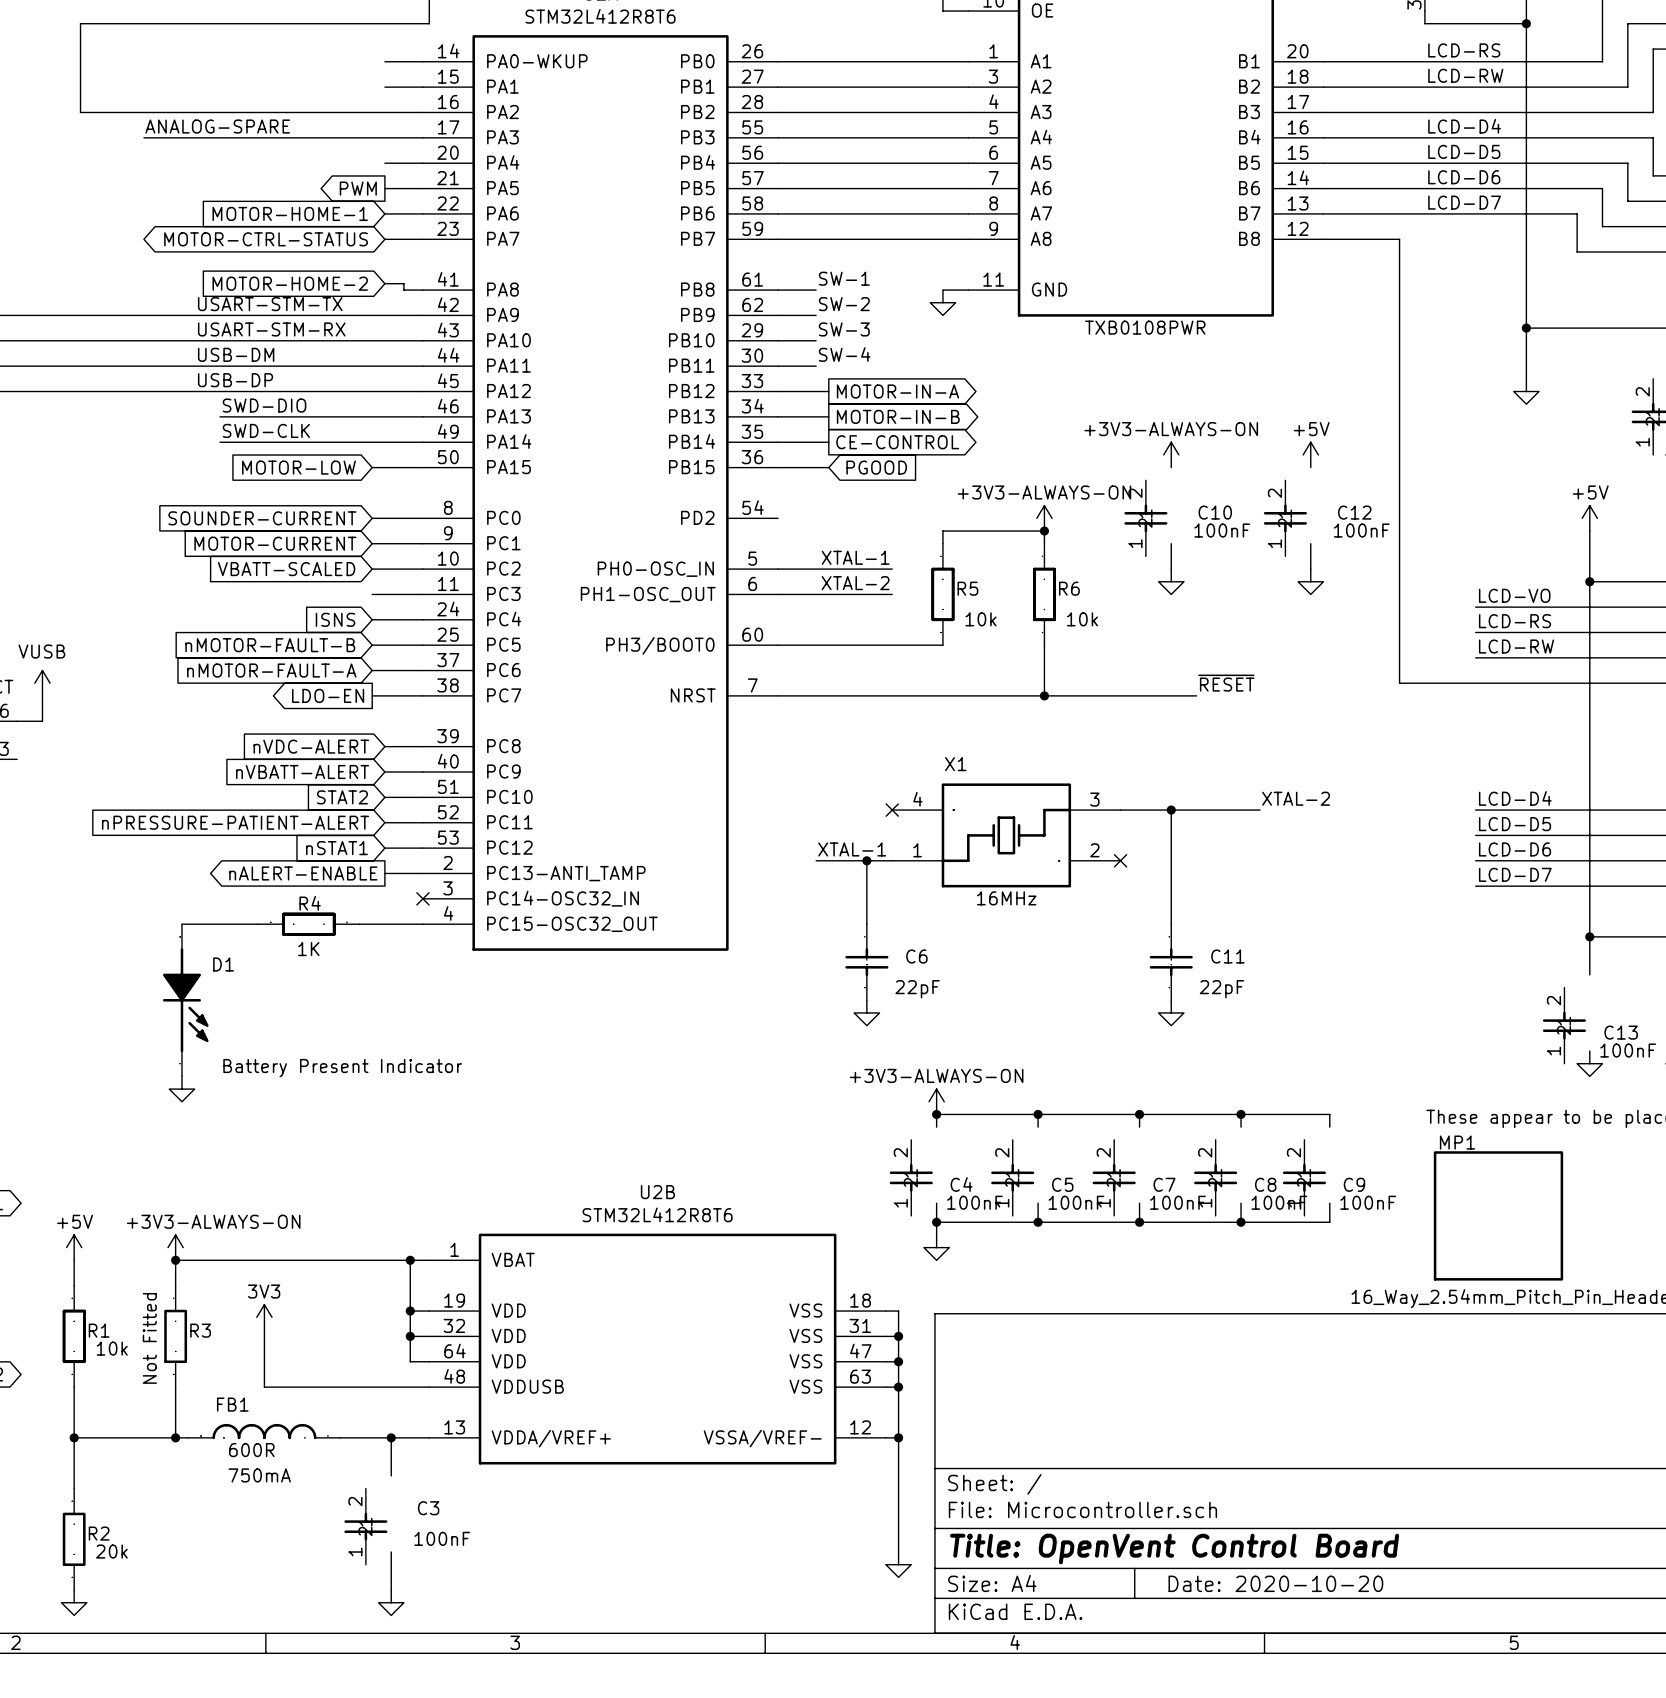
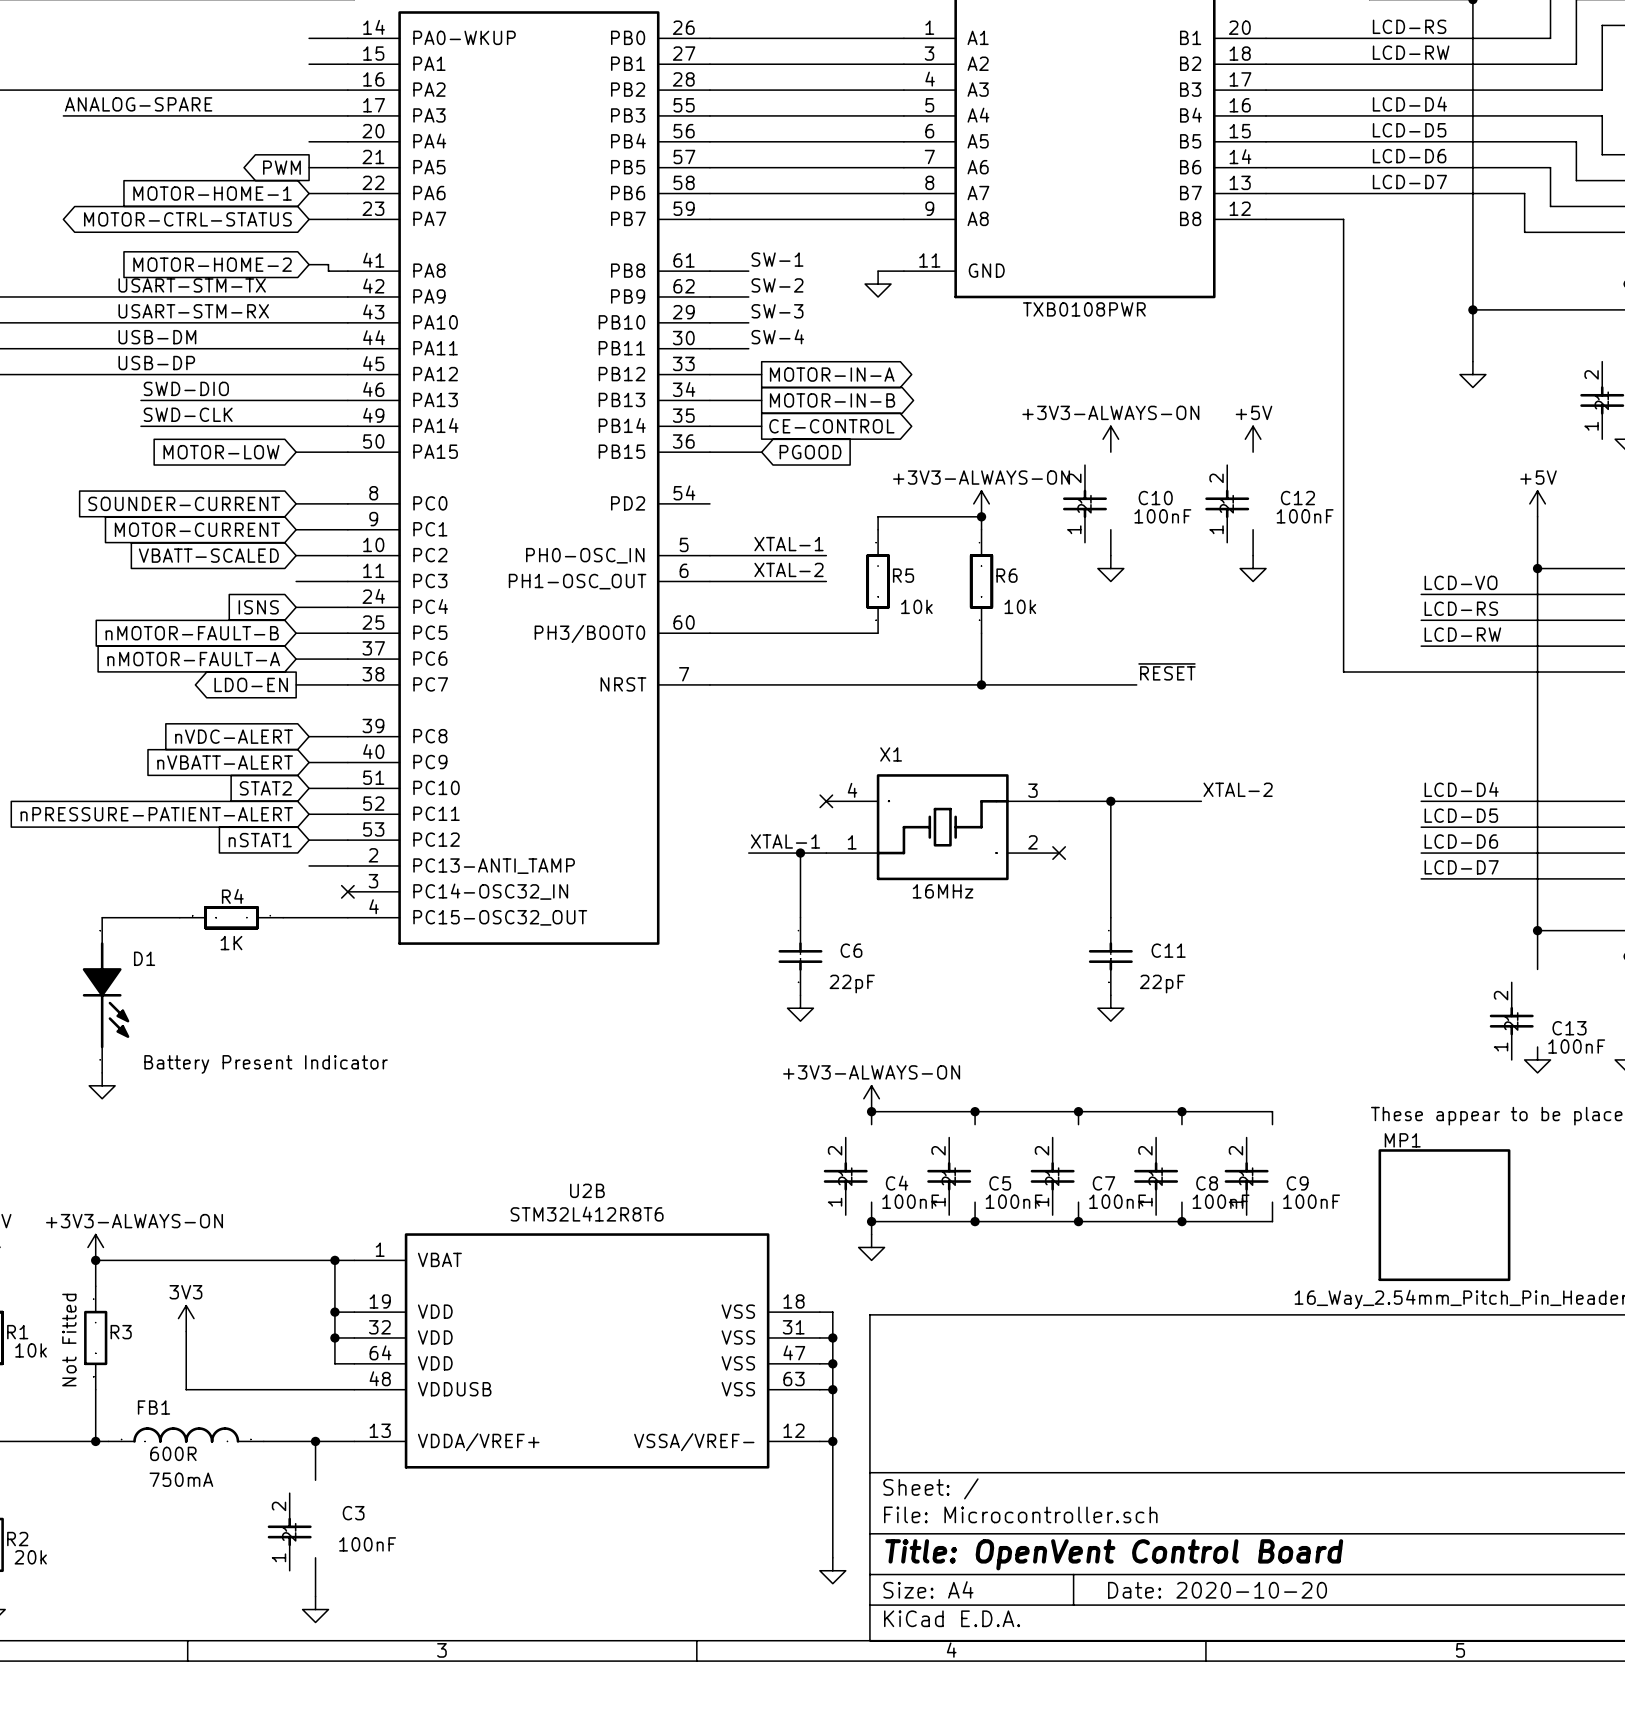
global label: nALERT-ENABLE (303, 873) -> none

